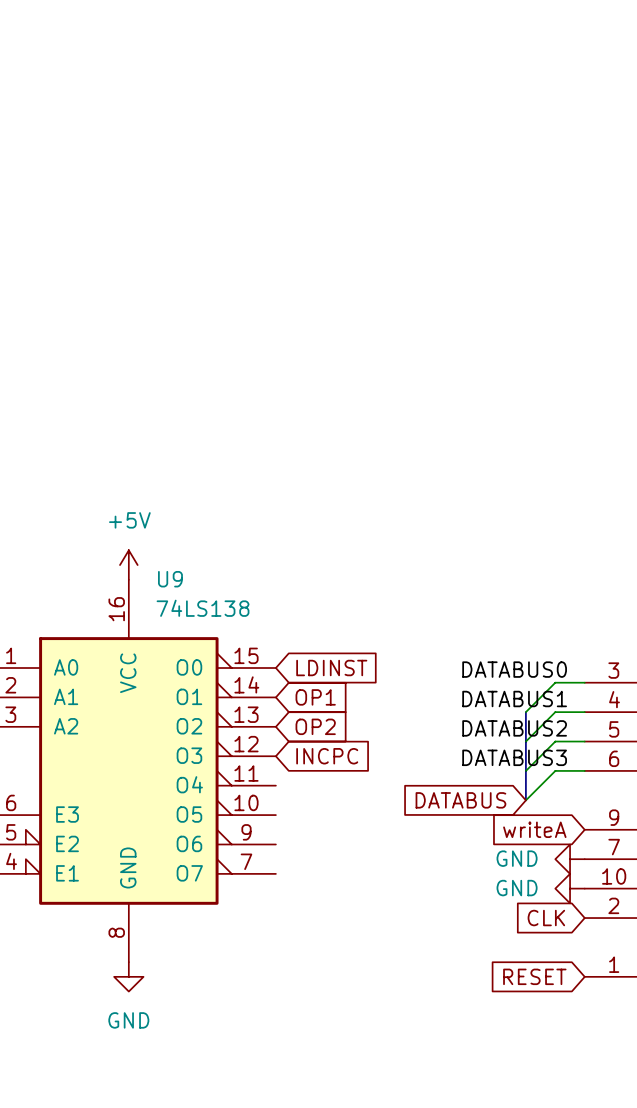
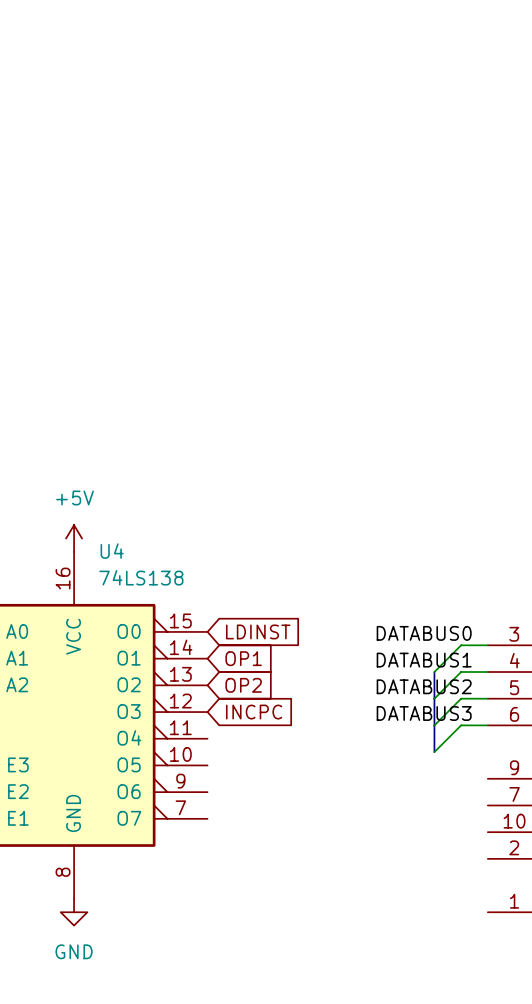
U9 name: U9 (170, 579) -> U4 (112, 551)
global label: DATABUS (460, 800) -> none
global label: writeA (534, 829) -> none
power symbol: GND (570, 859) -> none
power symbol: GND (570, 888) -> none
global label: CLK (546, 918) -> none
global label: RESET (534, 976) -> none

